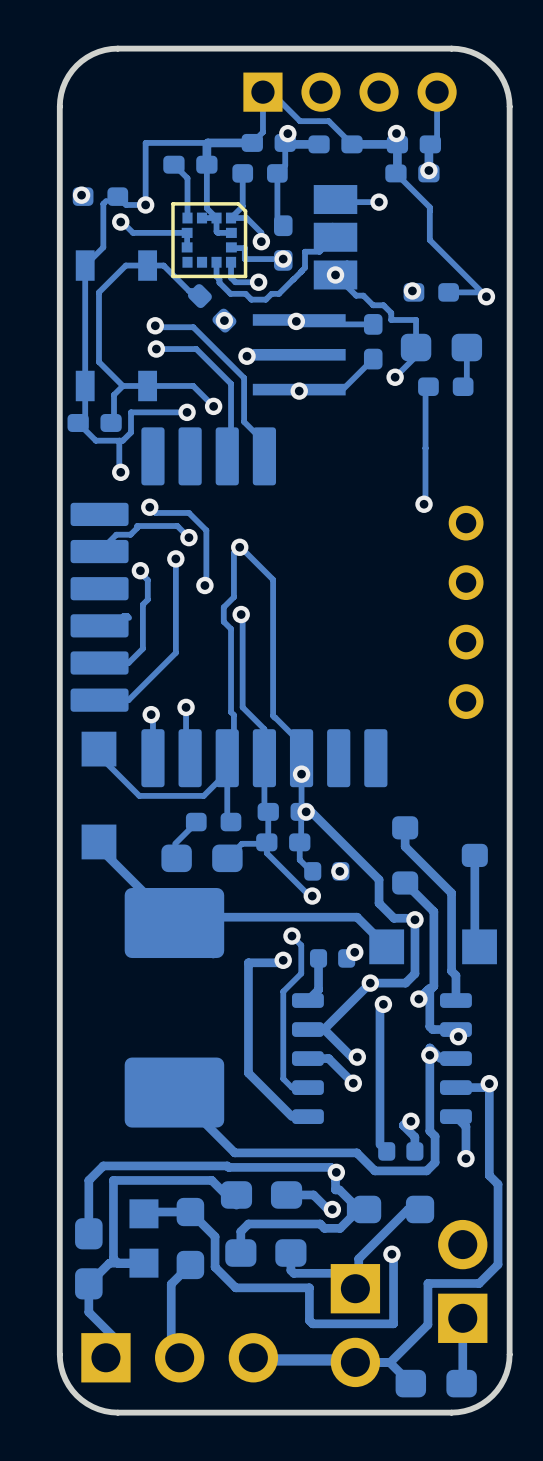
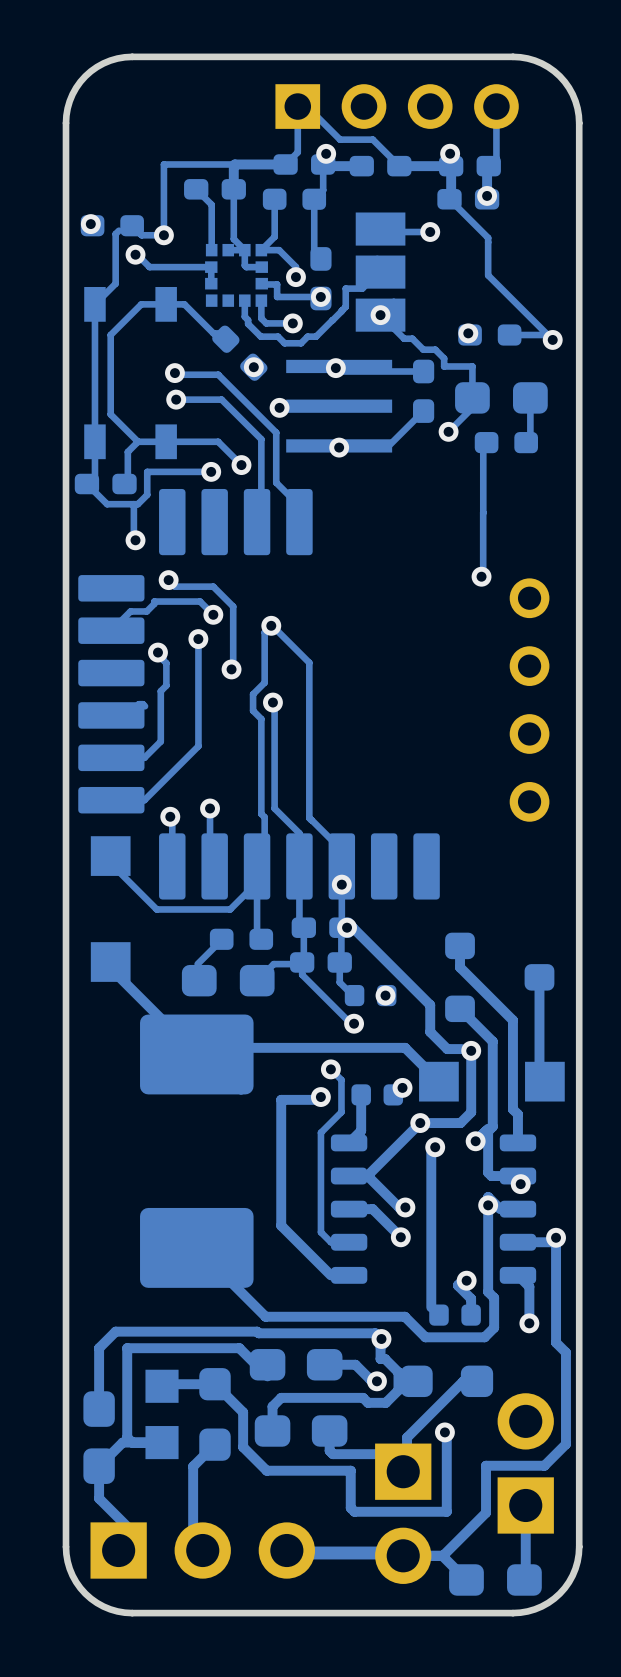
part footprint: [171, 202, 248, 279] -> [205, 243, 268, 307]

